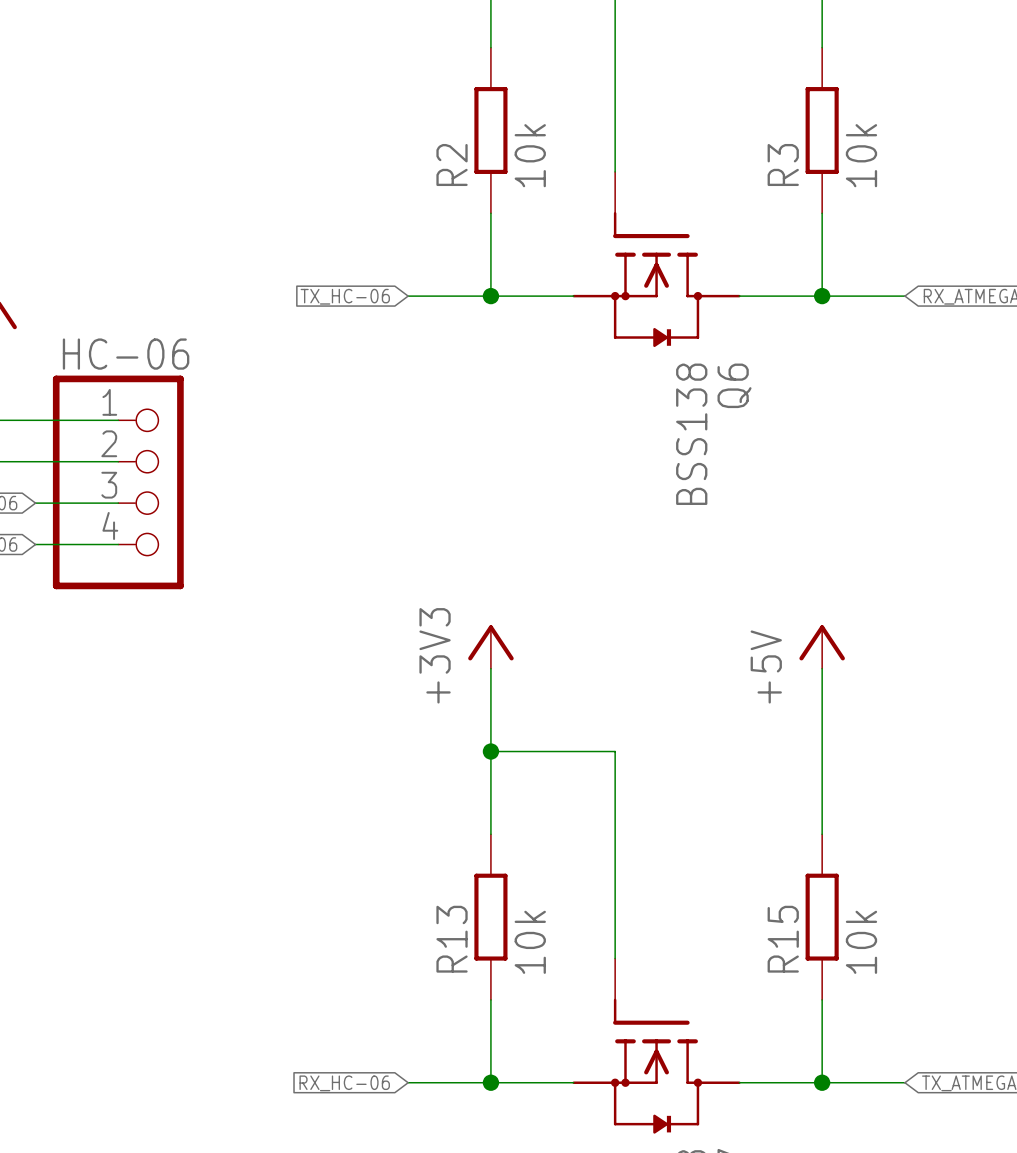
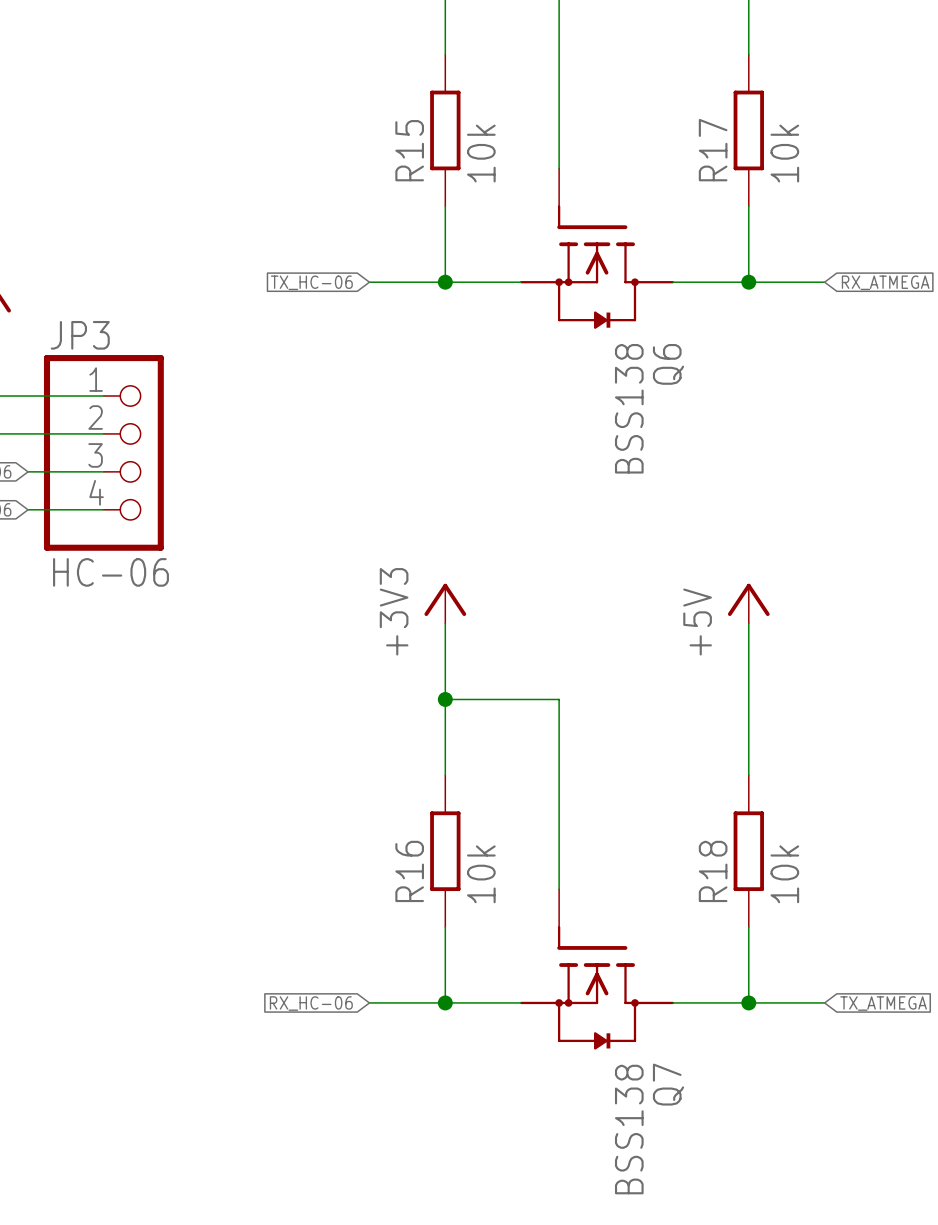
R2 name: R2 (452, 164) -> R15 (409, 150)
R3 name: R3 (783, 164) -> R17 (713, 150)
HC-06 name: HC-06 (126, 354) -> JP3 (80, 335)
HC-06 value: none -> HC-06 (110, 572)
R13 name: R13 (452, 939) -> R16 (409, 871)
R15 name: R15 (783, 939) -> R18 (713, 871)

